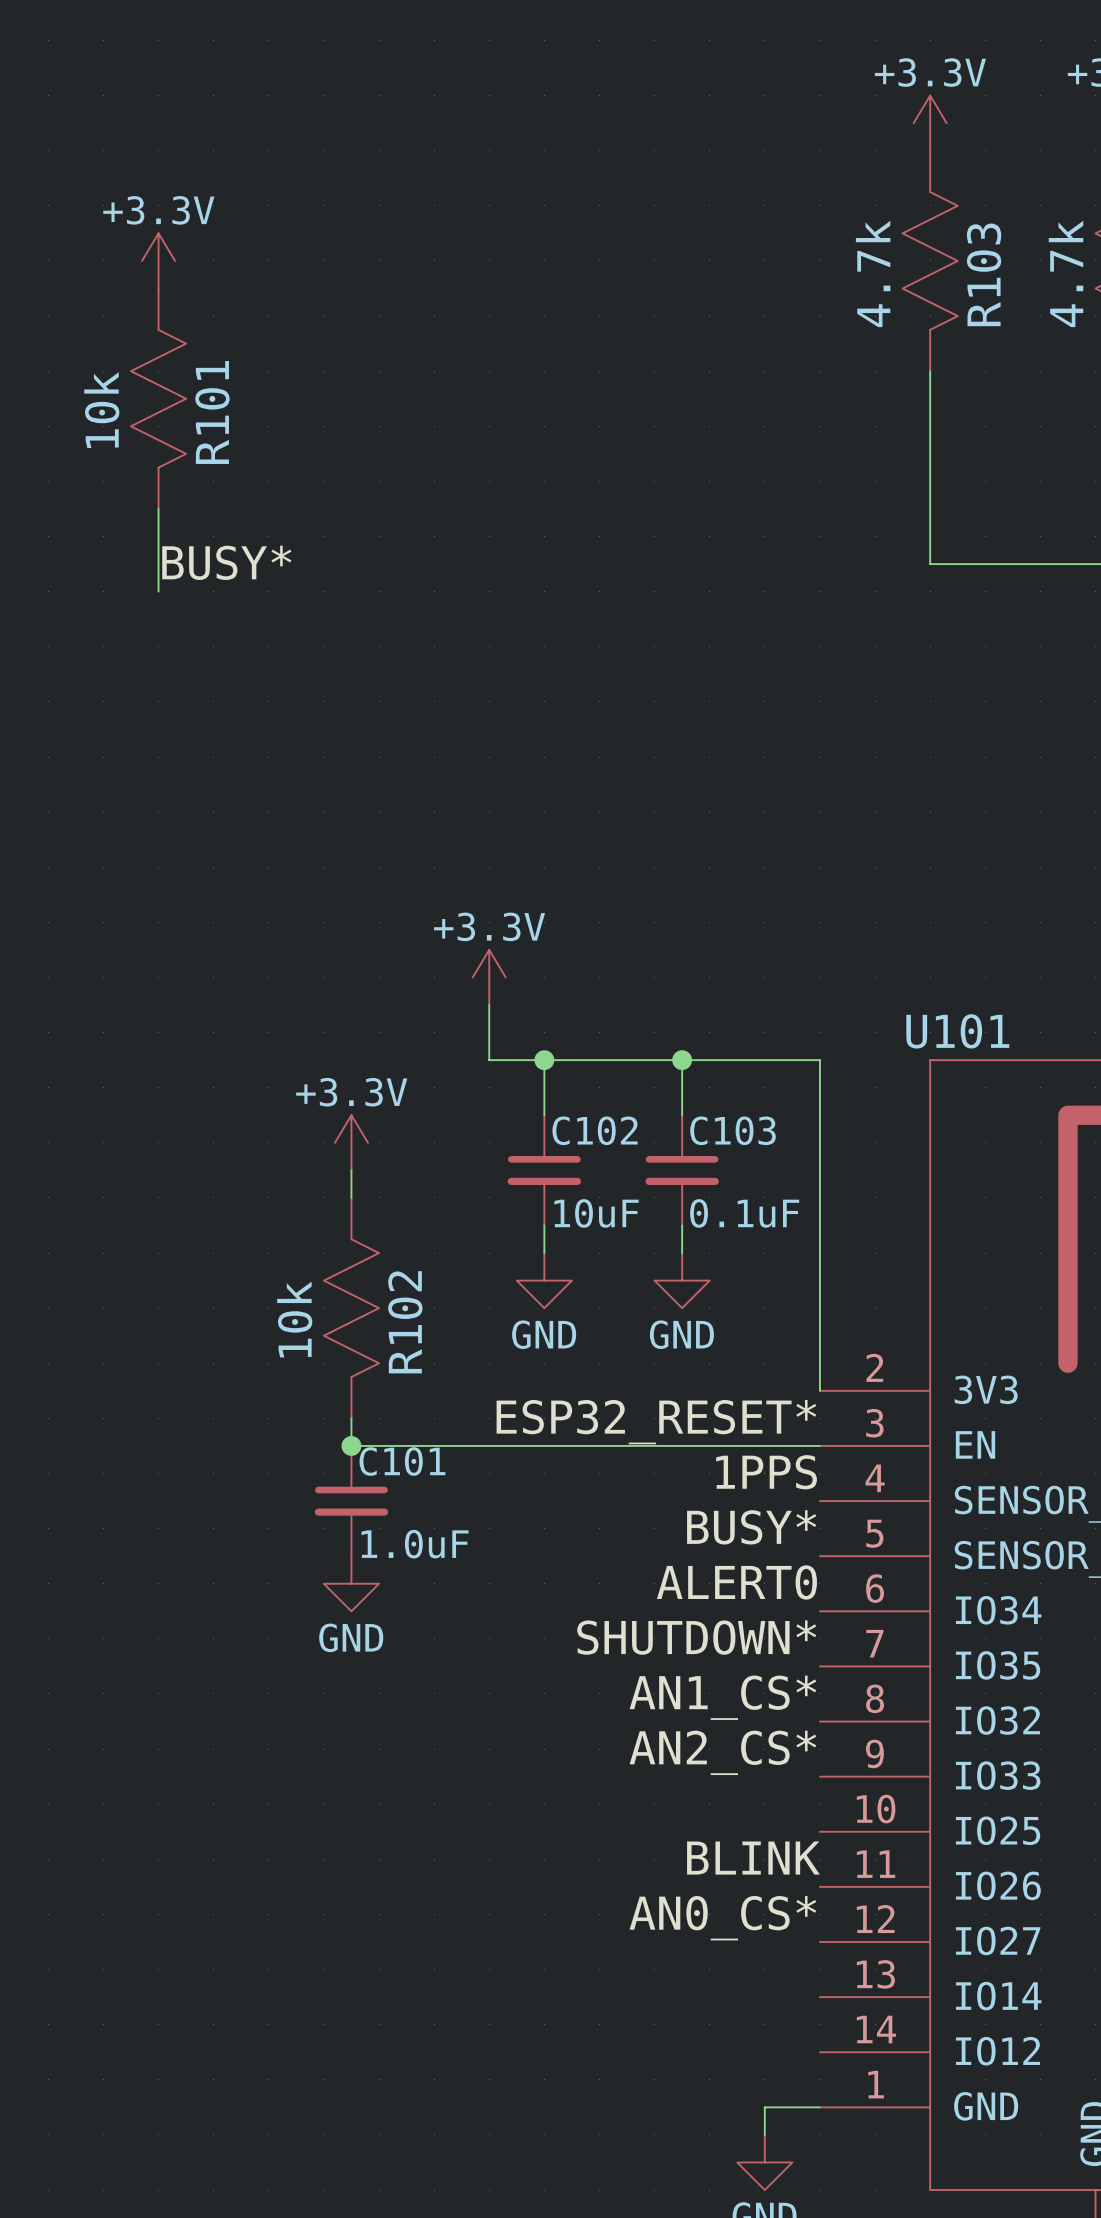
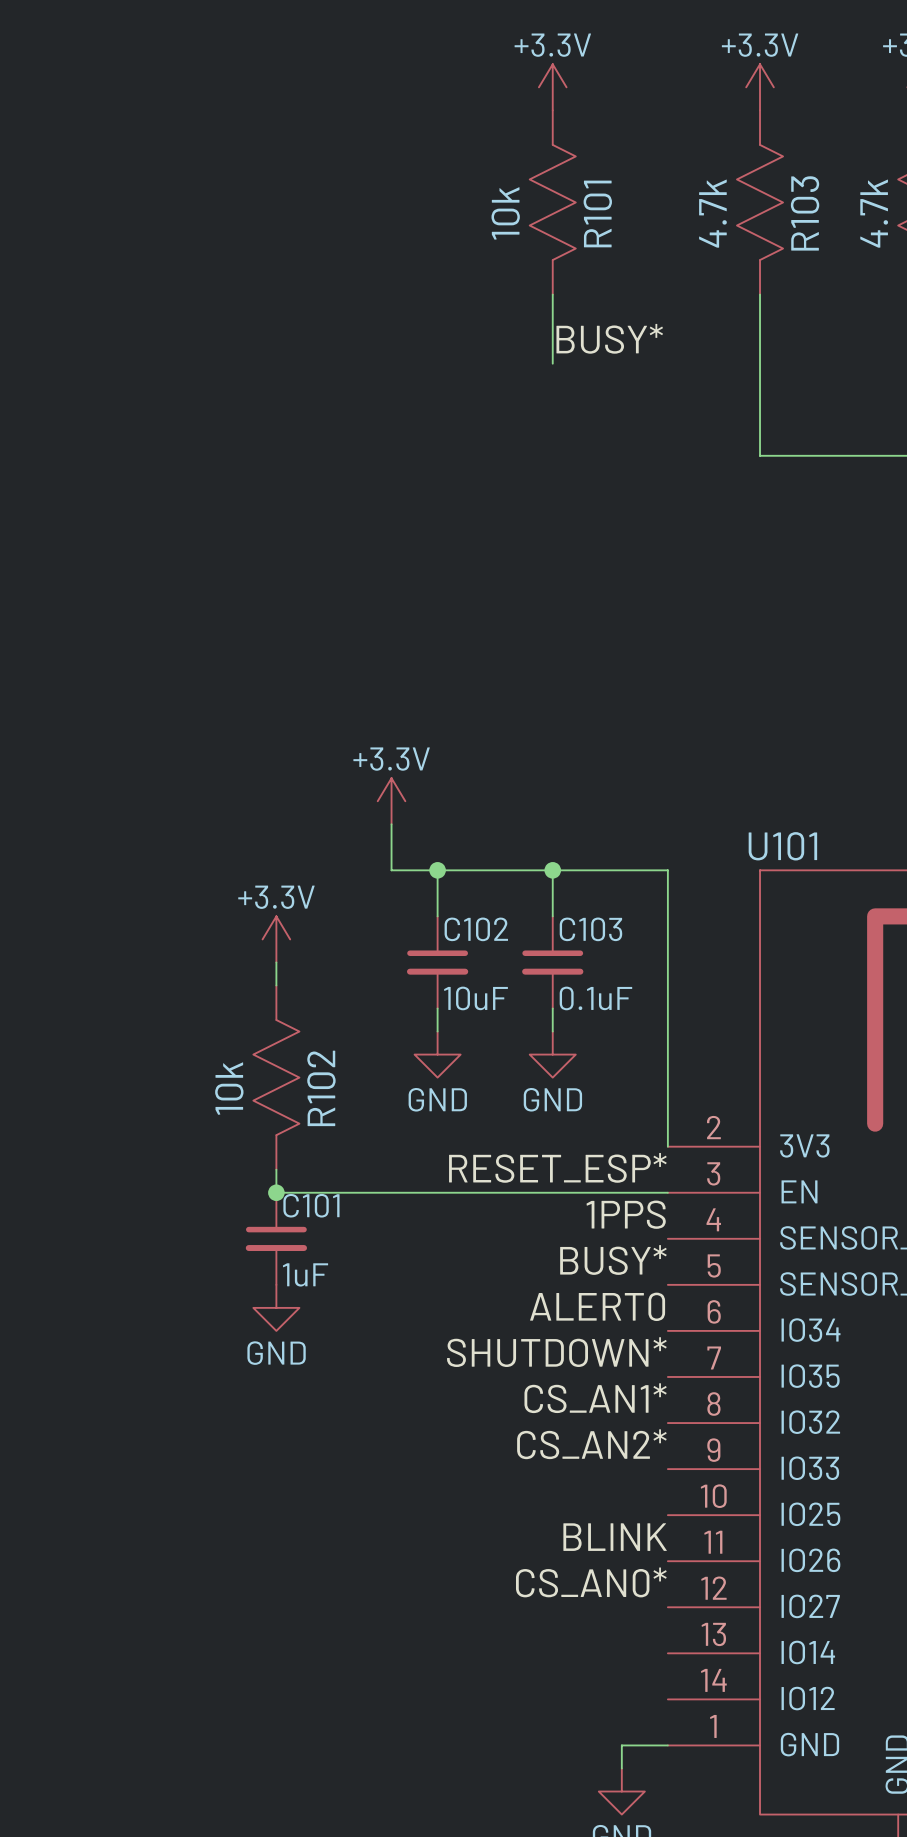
power symbol position: +3.3V (158, 260) -> +3.3V (552, 87)
R101 position: (158, 398) -> (552, 202)
wire: (158, 508) (158, 591) -> (552, 294) (552, 363)
label position: BUSY* (226, 562) -> BUSY* (609, 338)
label: ESP32_RESET* (656, 1422) -> RESET_ESP* (557, 1167)
C101 value: 1.0uF (415, 1544) -> 1uF (305, 1274)
label: AN1_CS* (722, 1697) -> CS_AN1* (595, 1398)
label: AN2_CS* (722, 1752) -> CS_AN2* (591, 1444)
label: AN0_CS* (722, 1918) -> CS_AN0* (591, 1582)

